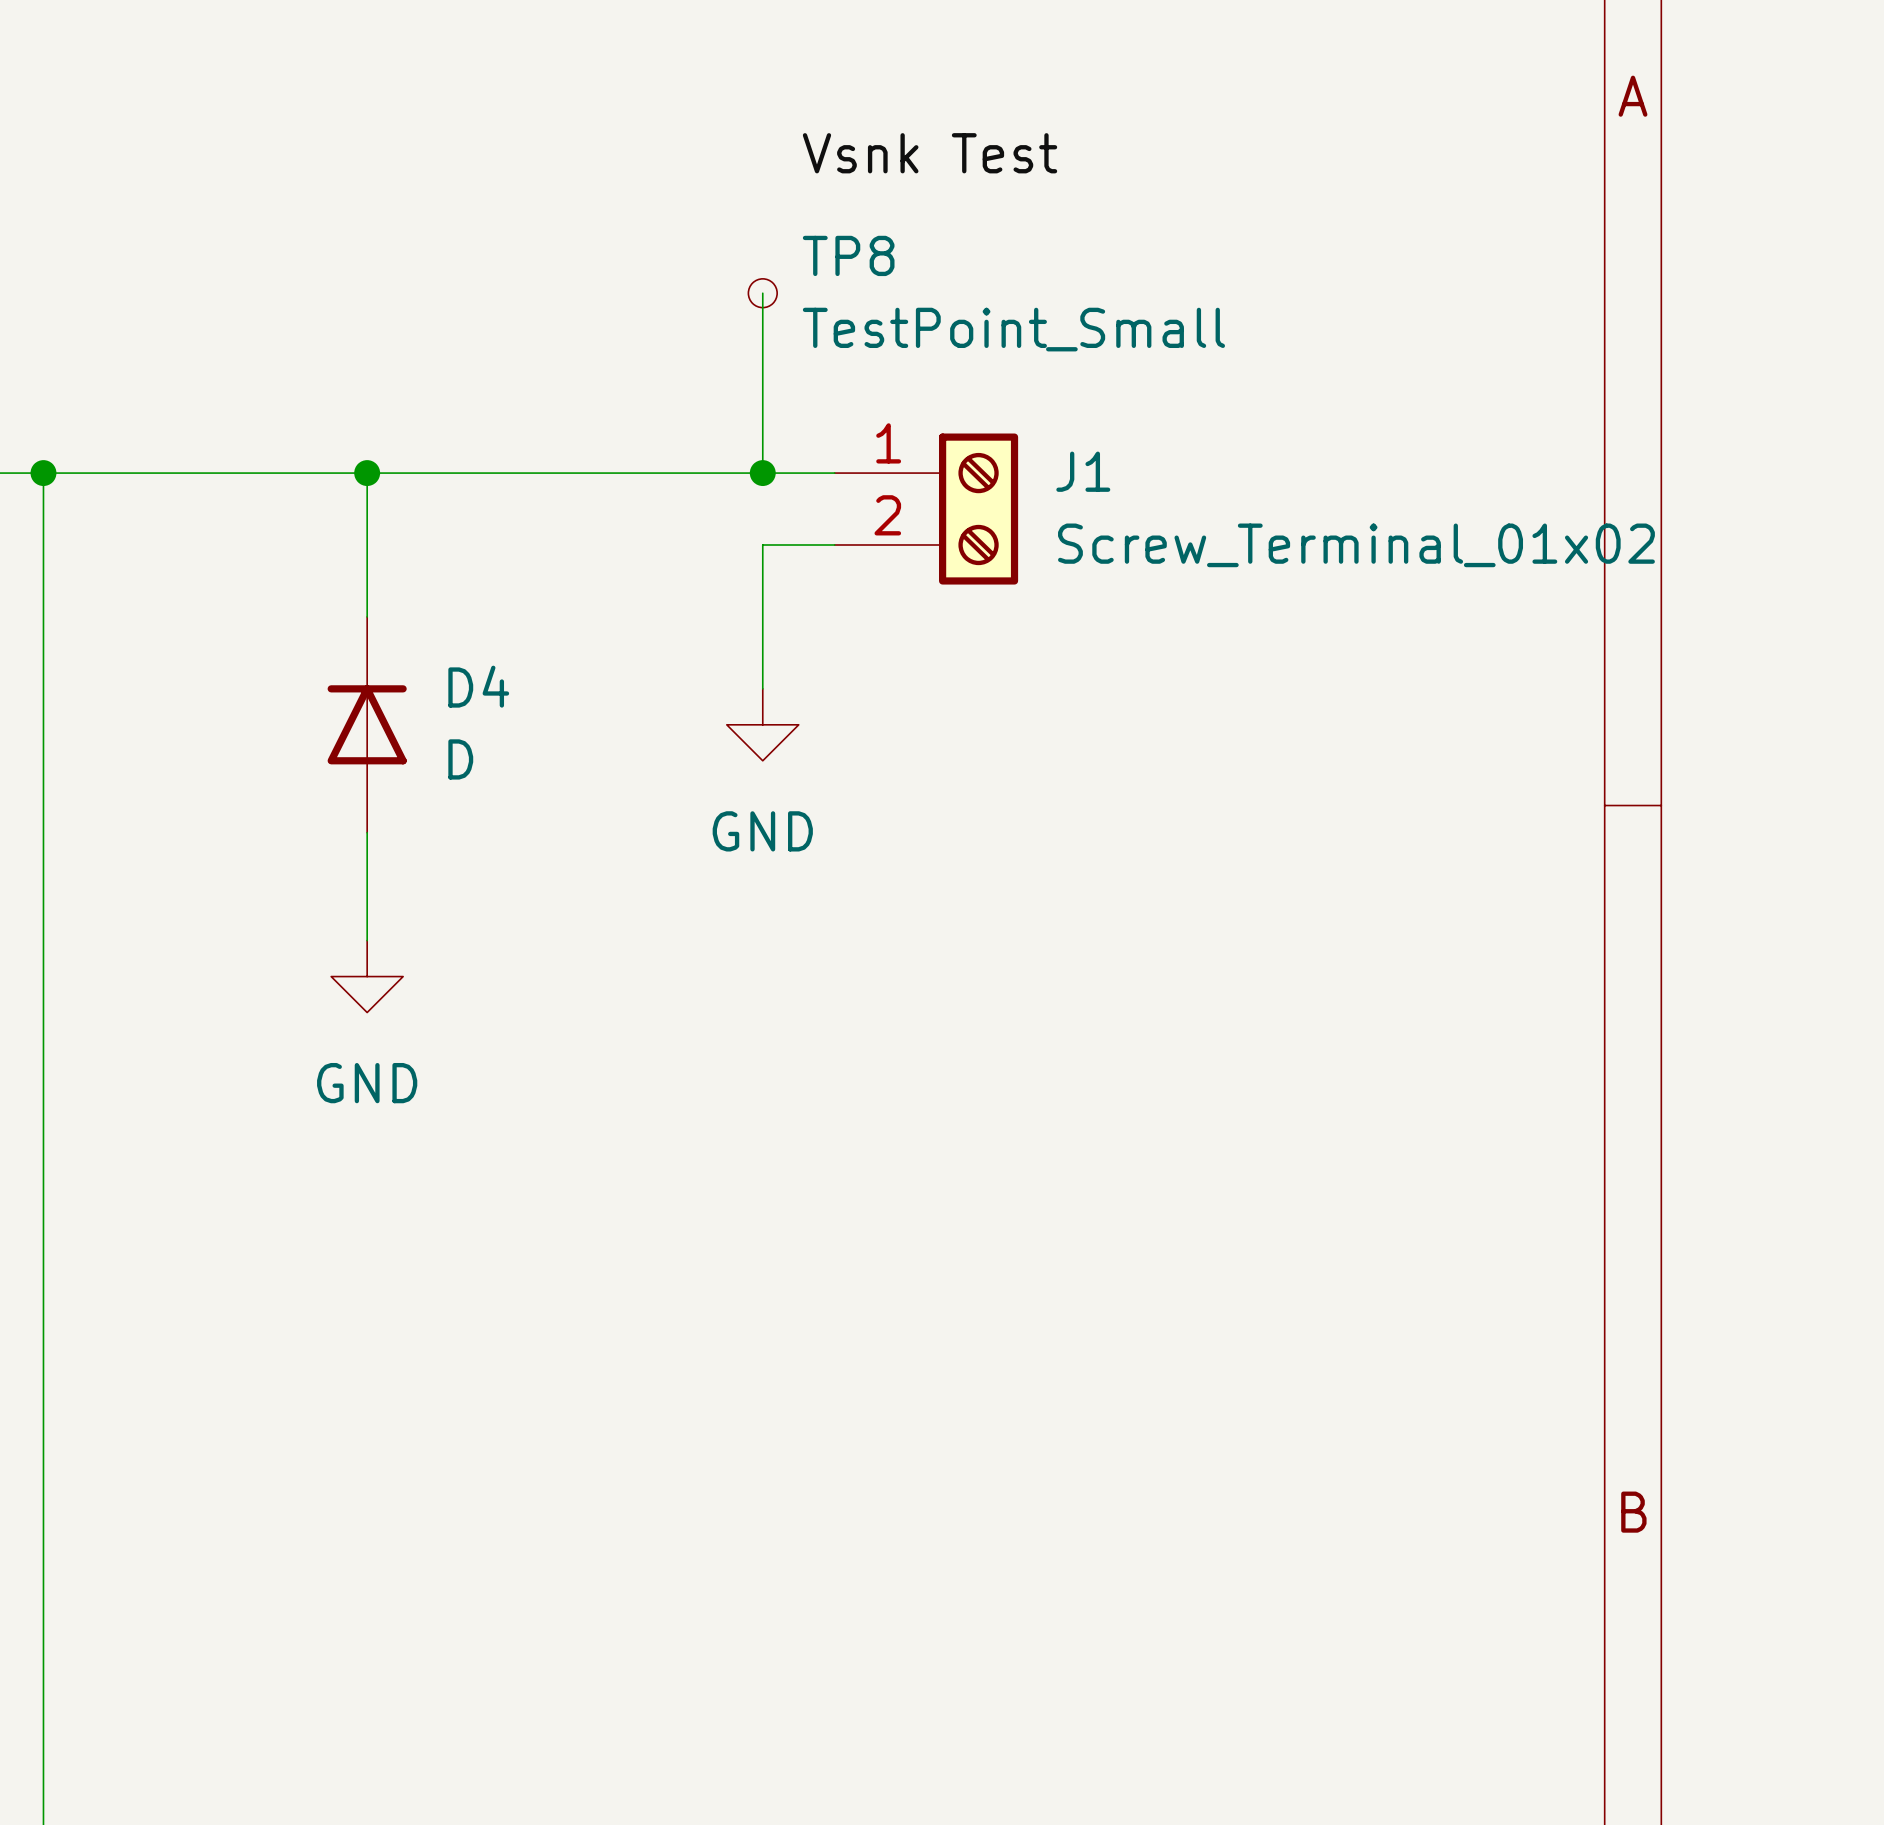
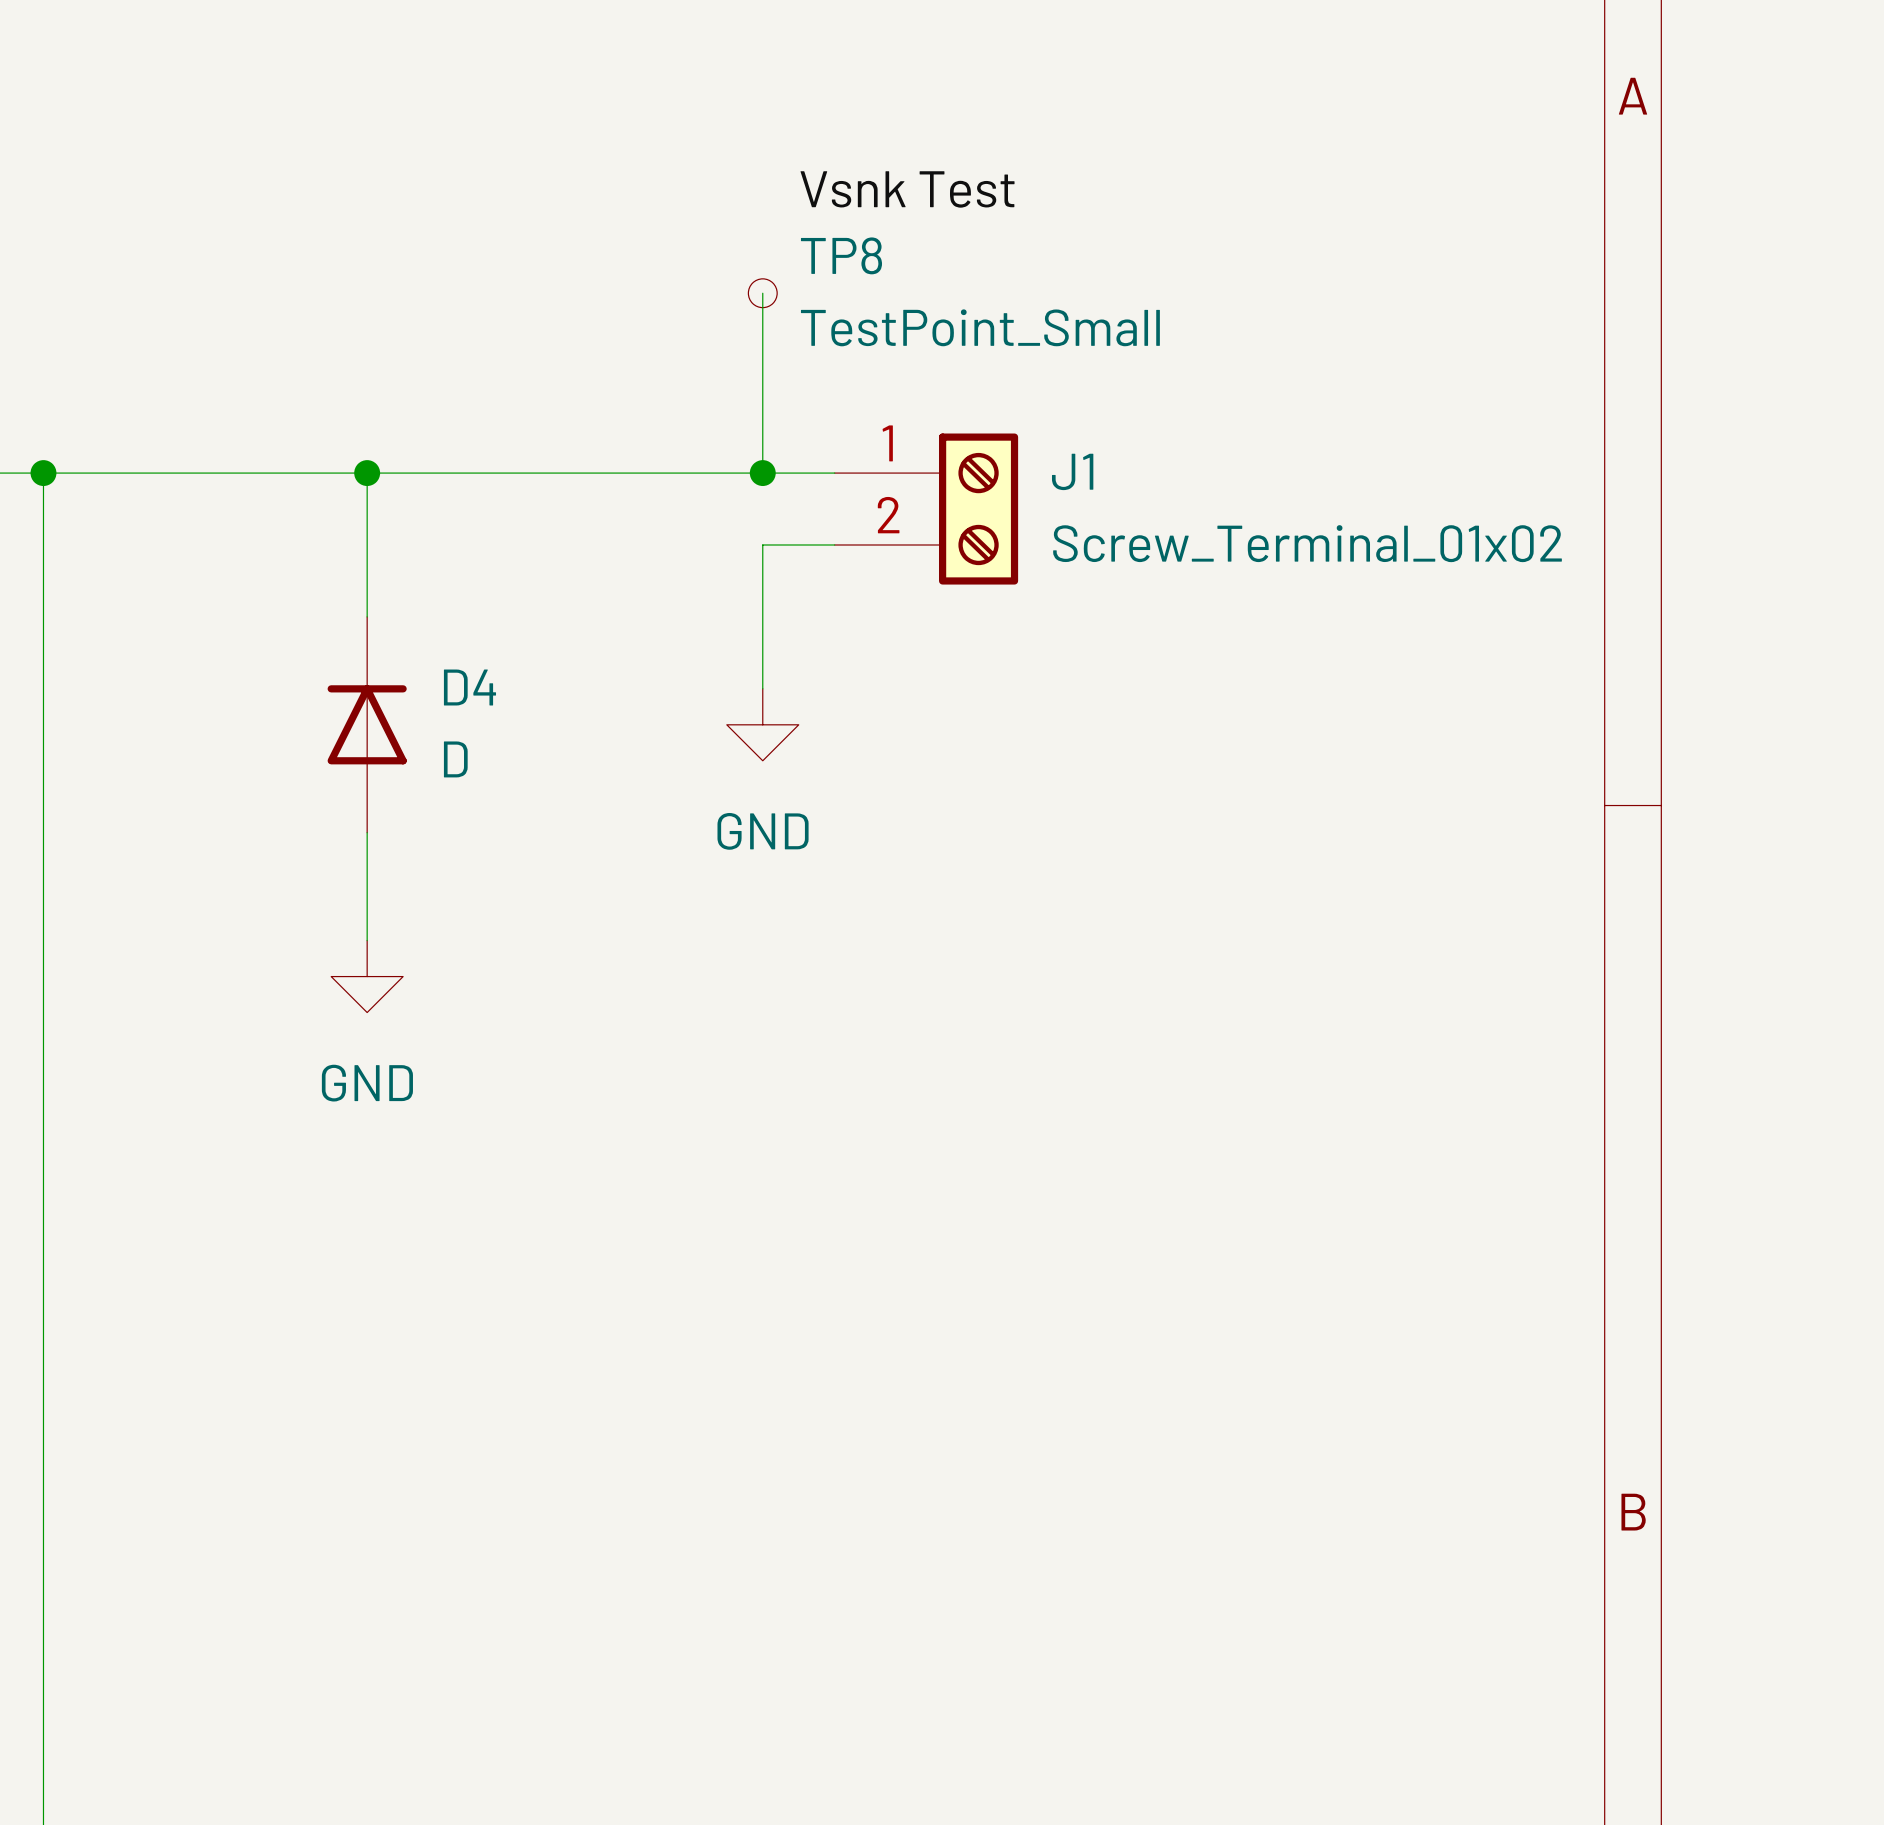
label position: Vsnk Test (930, 153) -> Vsnk Test (907, 189)

